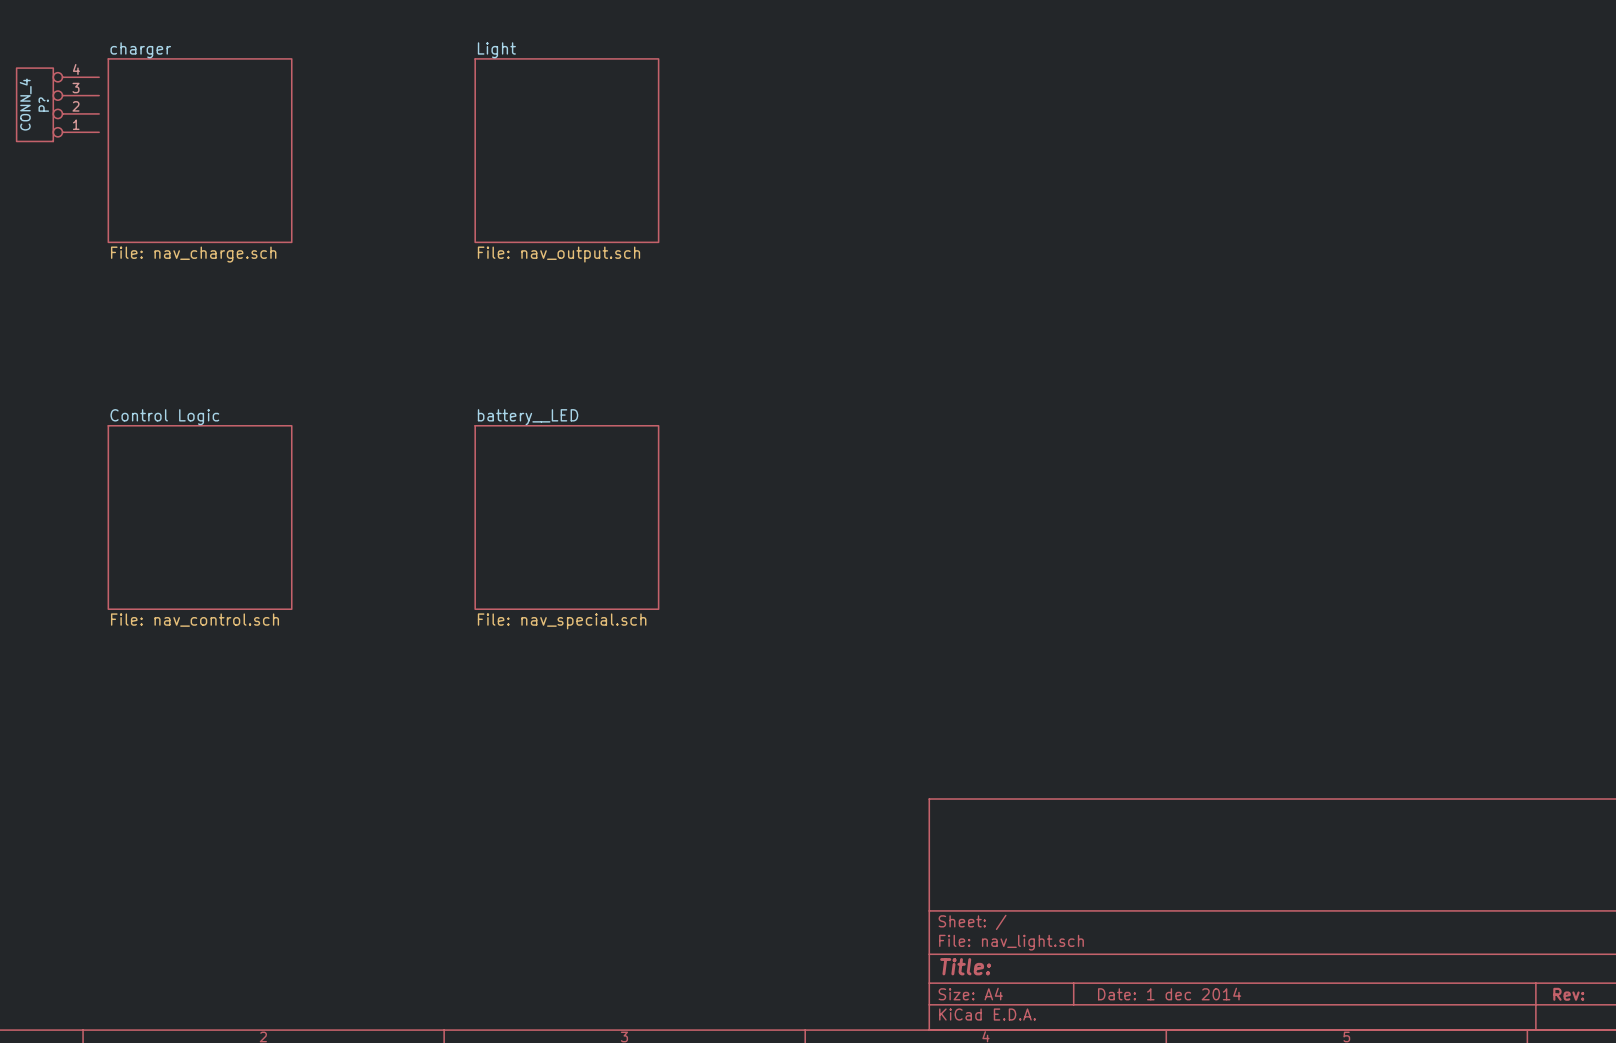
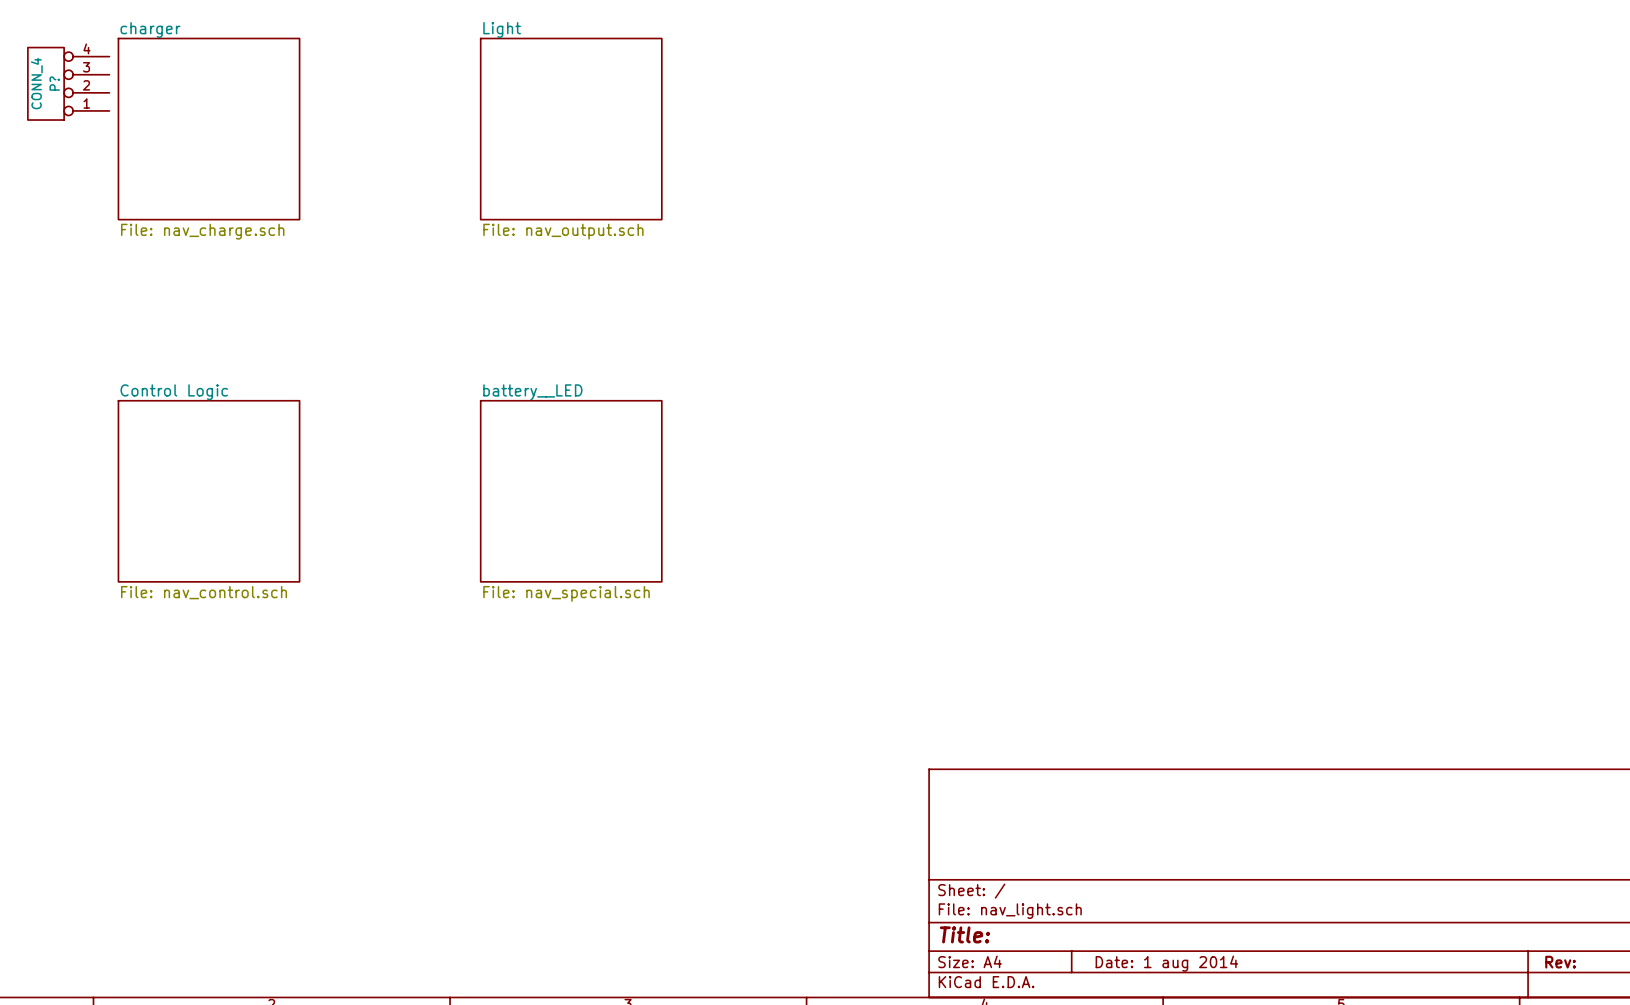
title block: Date: 1 dec 2014 (1169, 994) -> Date: 1 aug 2014 (1166, 963)

